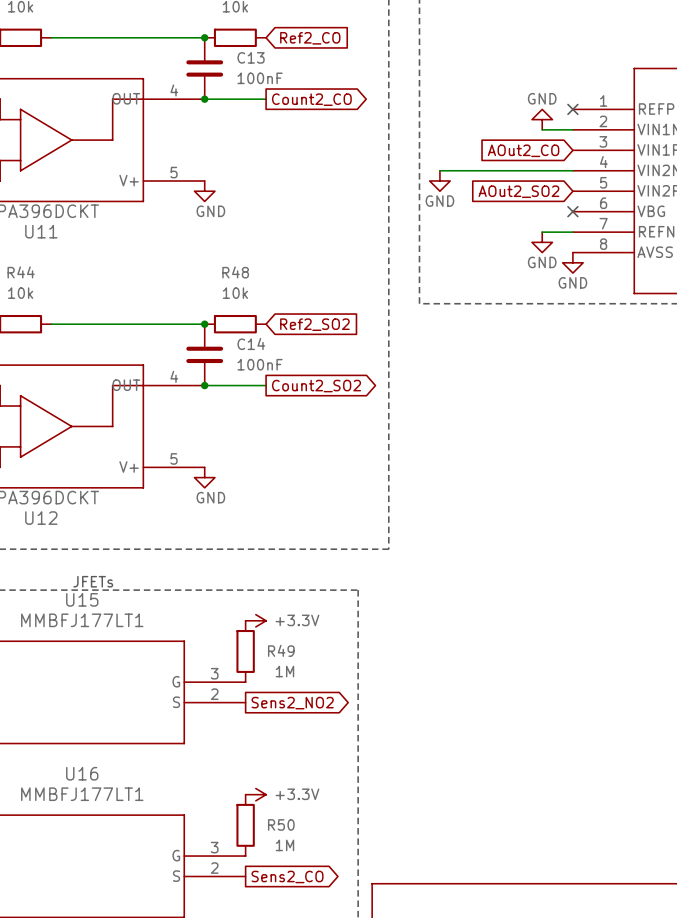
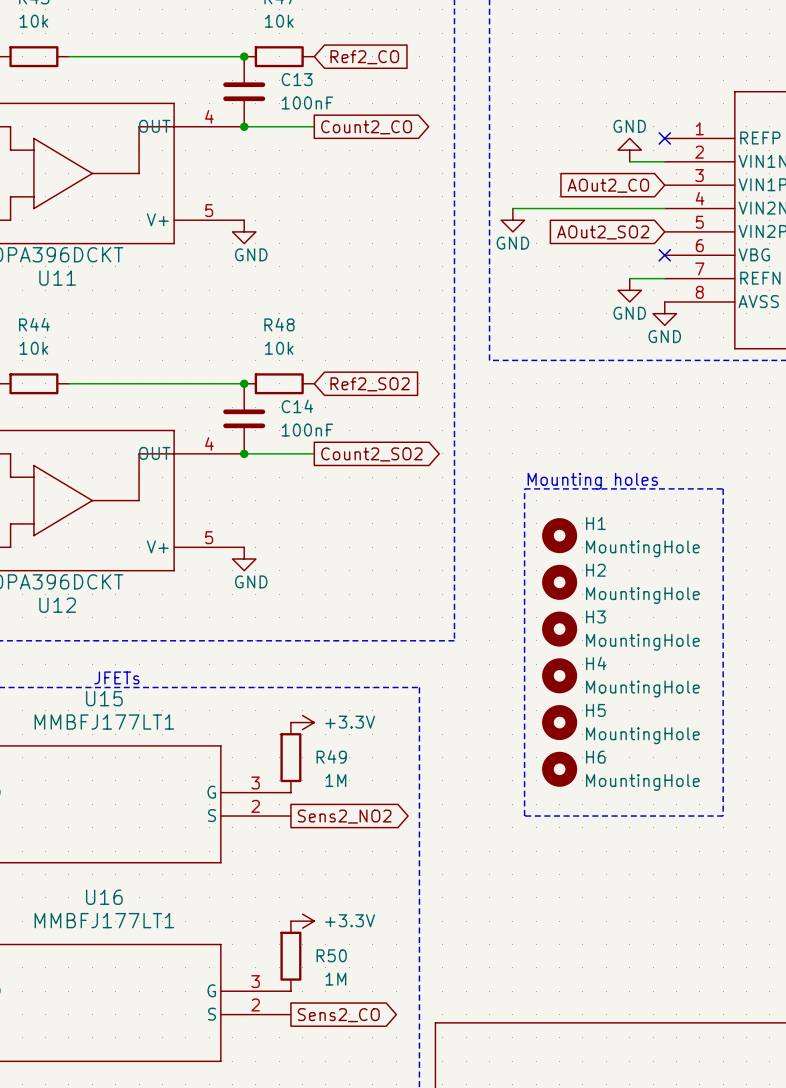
text: none -> Mounting holes (592, 481)
line: none -> (524, 488) (723, 488) (723, 816) (524, 816) (524, 488)
H1: none -> MountingHole (559, 535)
H2: none -> MountingHole (559, 582)
H3: none -> MountingHole (559, 629)
H4: none -> MountingHole (559, 675)
H5: none -> MountingHole (559, 722)
H6: none -> MountingHole (559, 769)

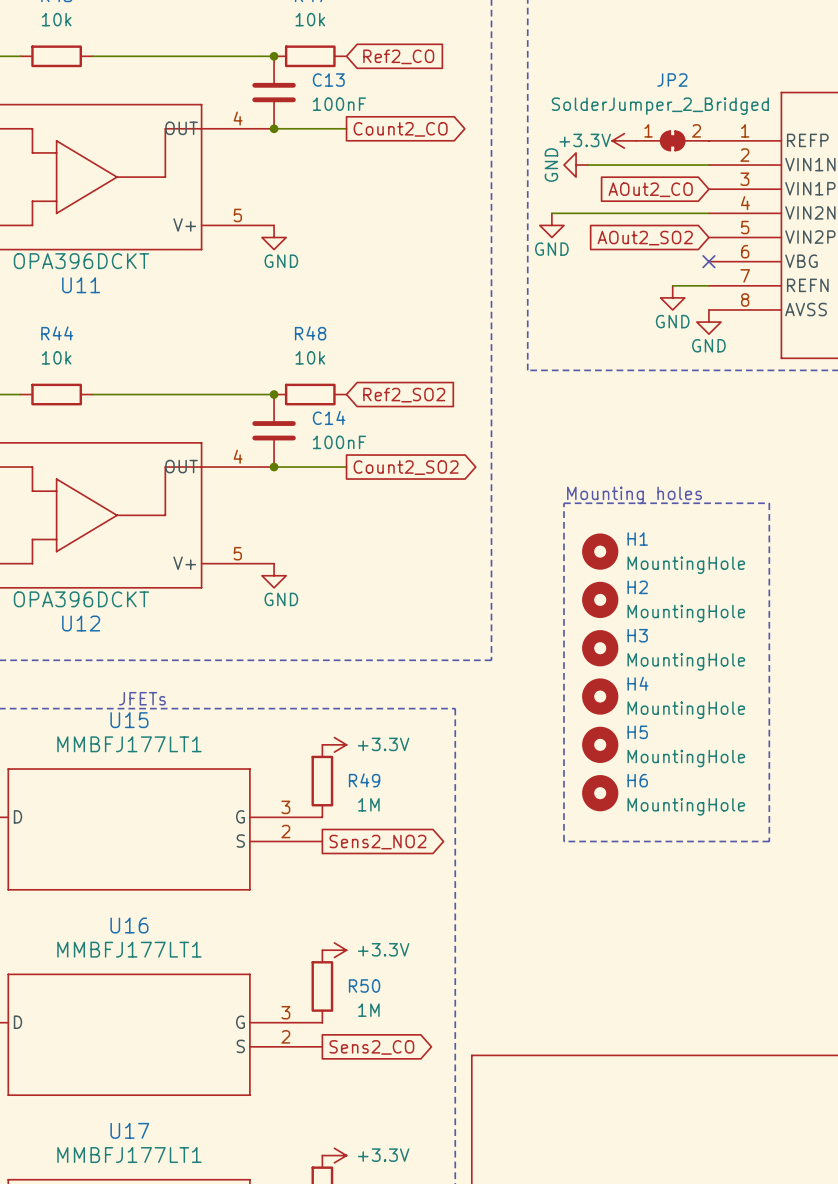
power symbol: none -> +3.3V (624, 140)
JP2: none -> SolderJumper_2_Bridged (672, 140)
no-connect mark: (664, 138) -> none
power symbol rotation: 0° (629, 150) -> 90° counterclockwise (576, 165)
power symbol position: GND (629, 150) -> GND (576, 165)
wire: none -> (588, 165) (672, 165)

